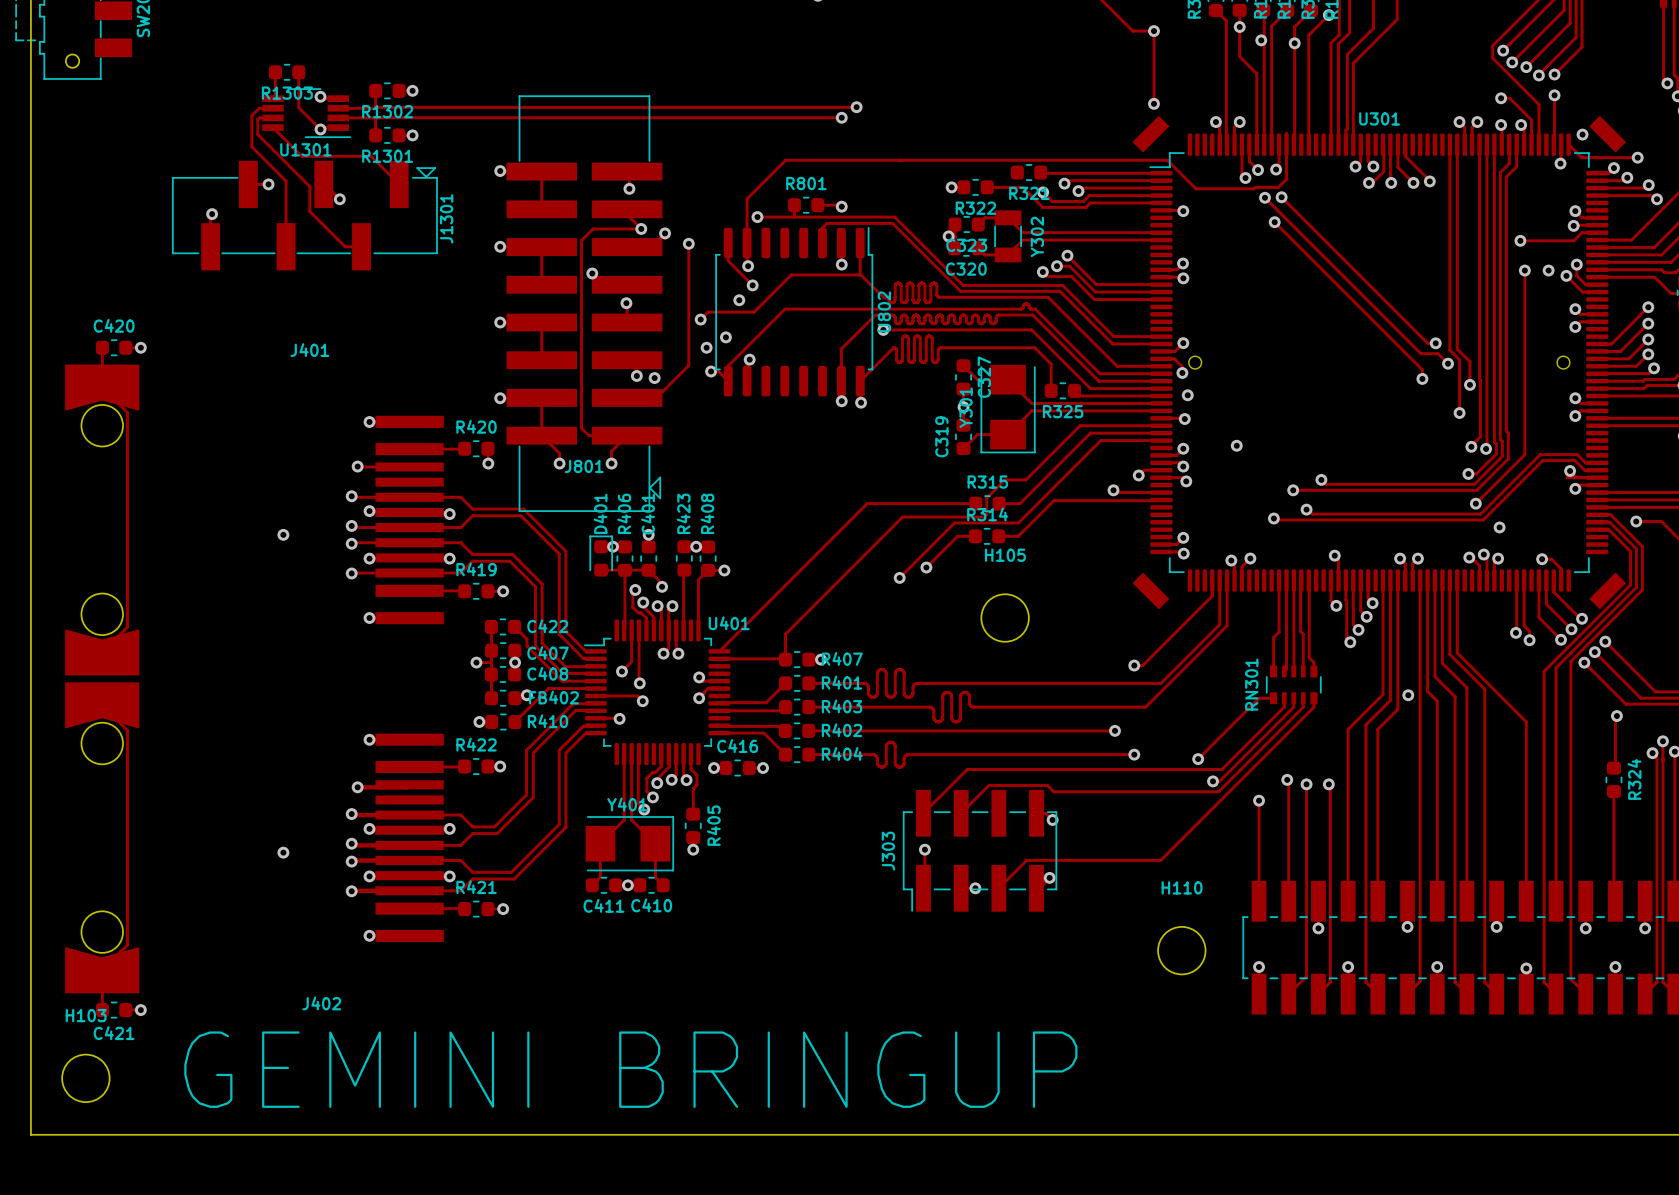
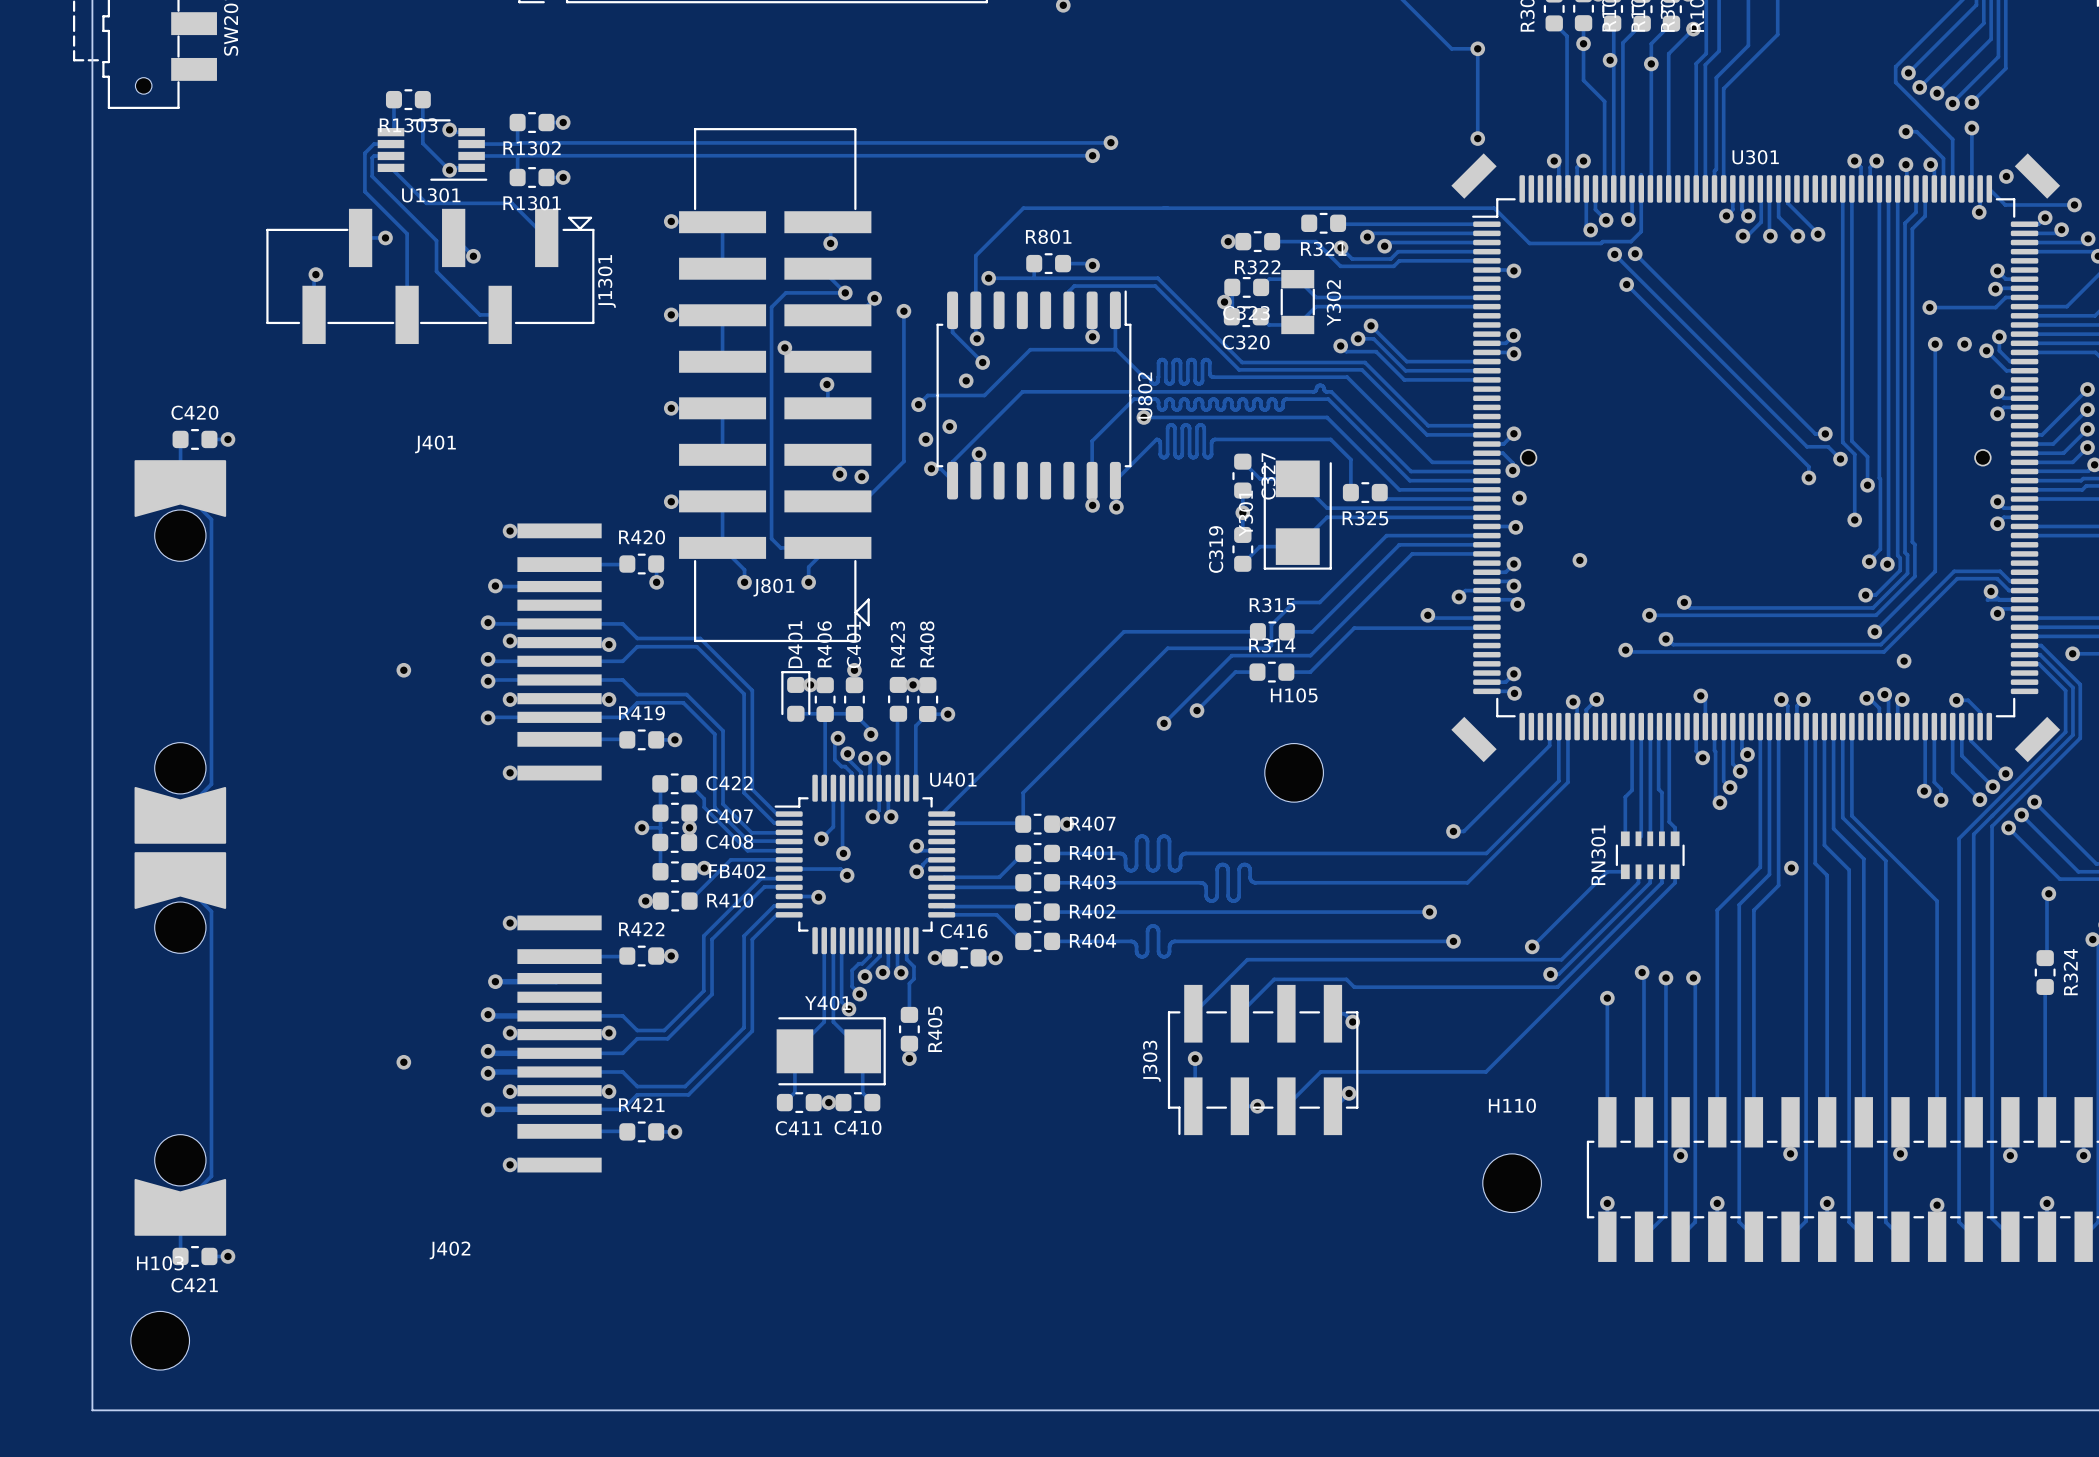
text: GEMINI BRINGUP (630, 1069) -> none

